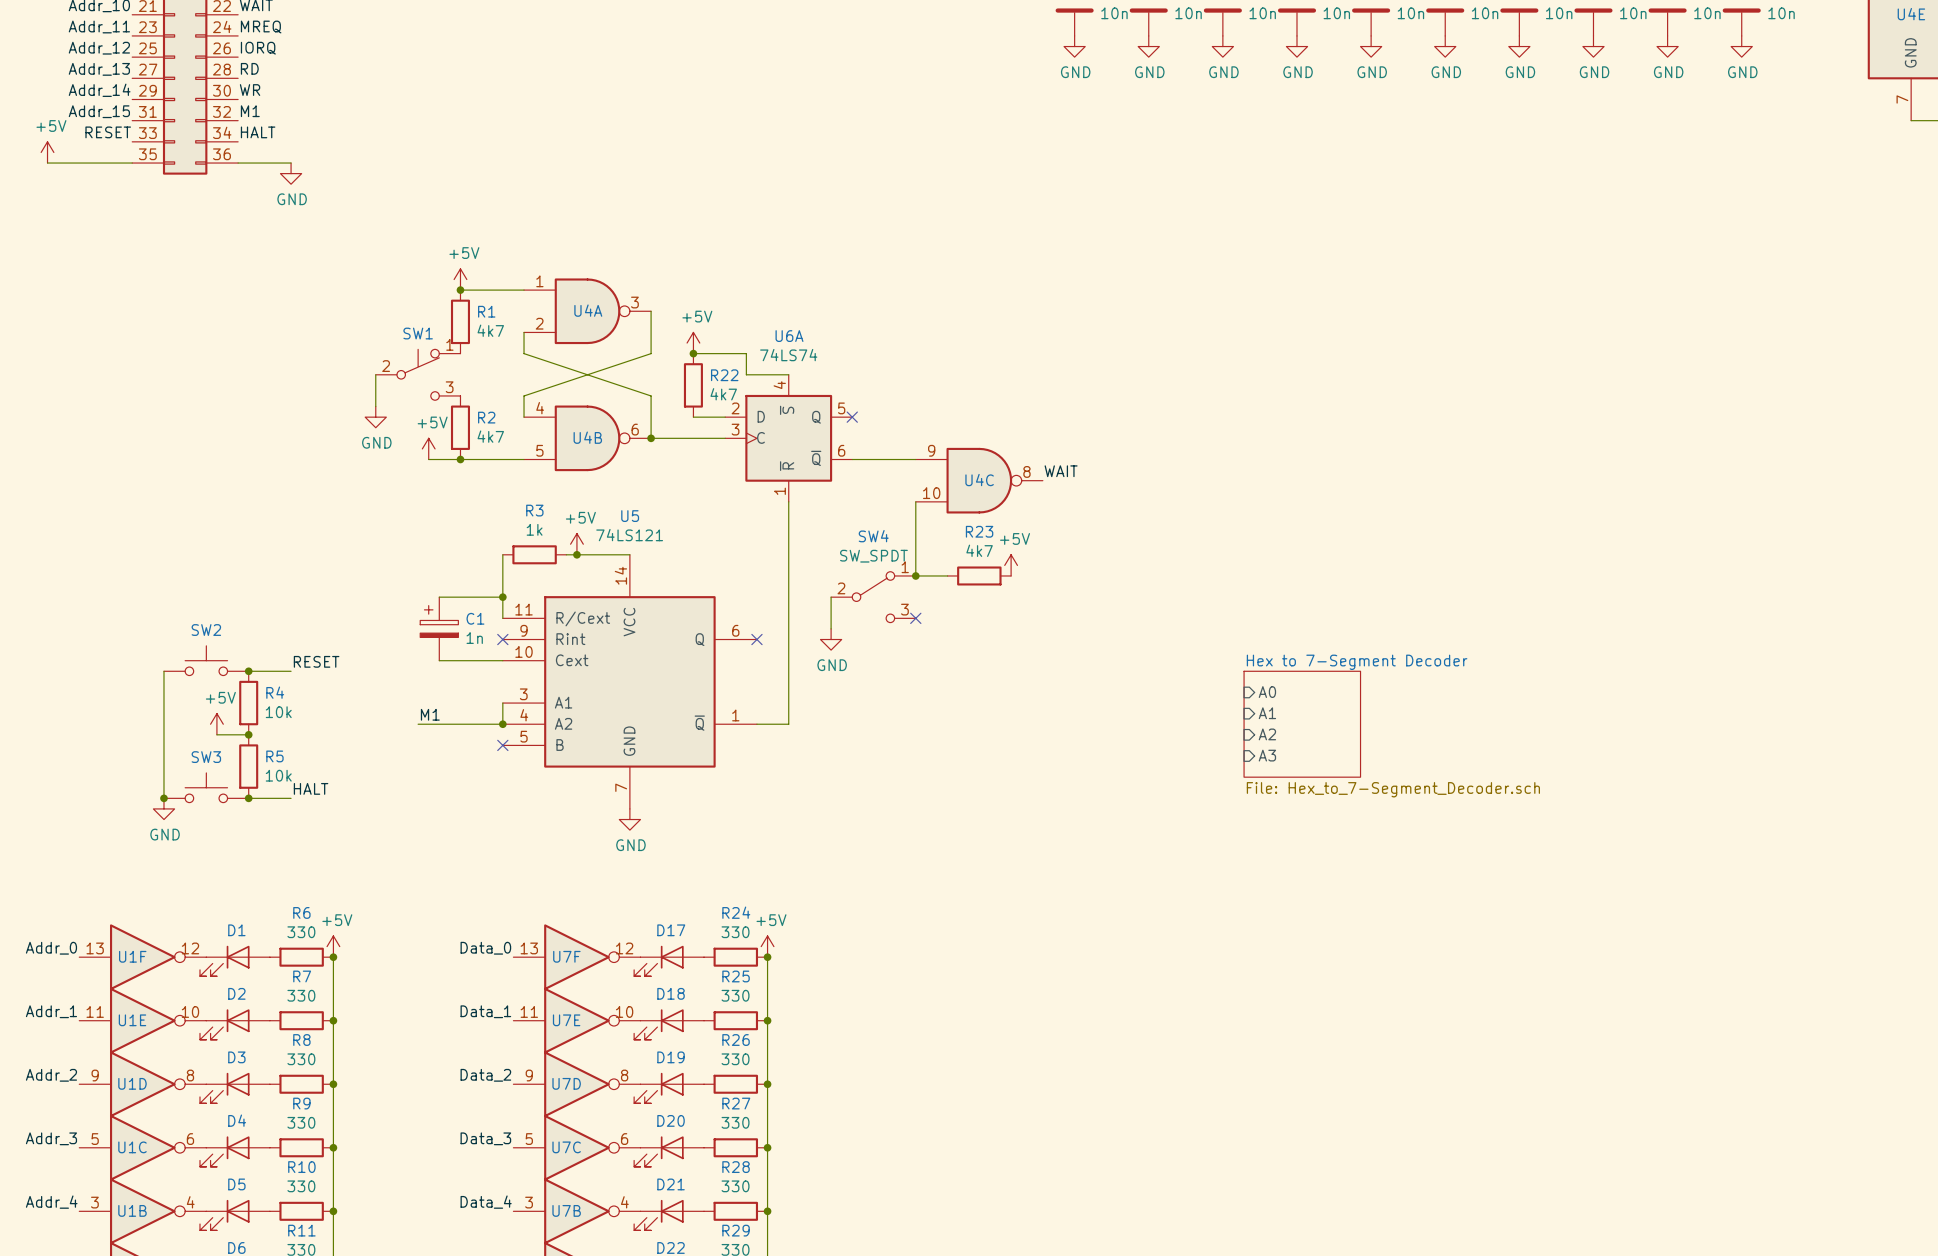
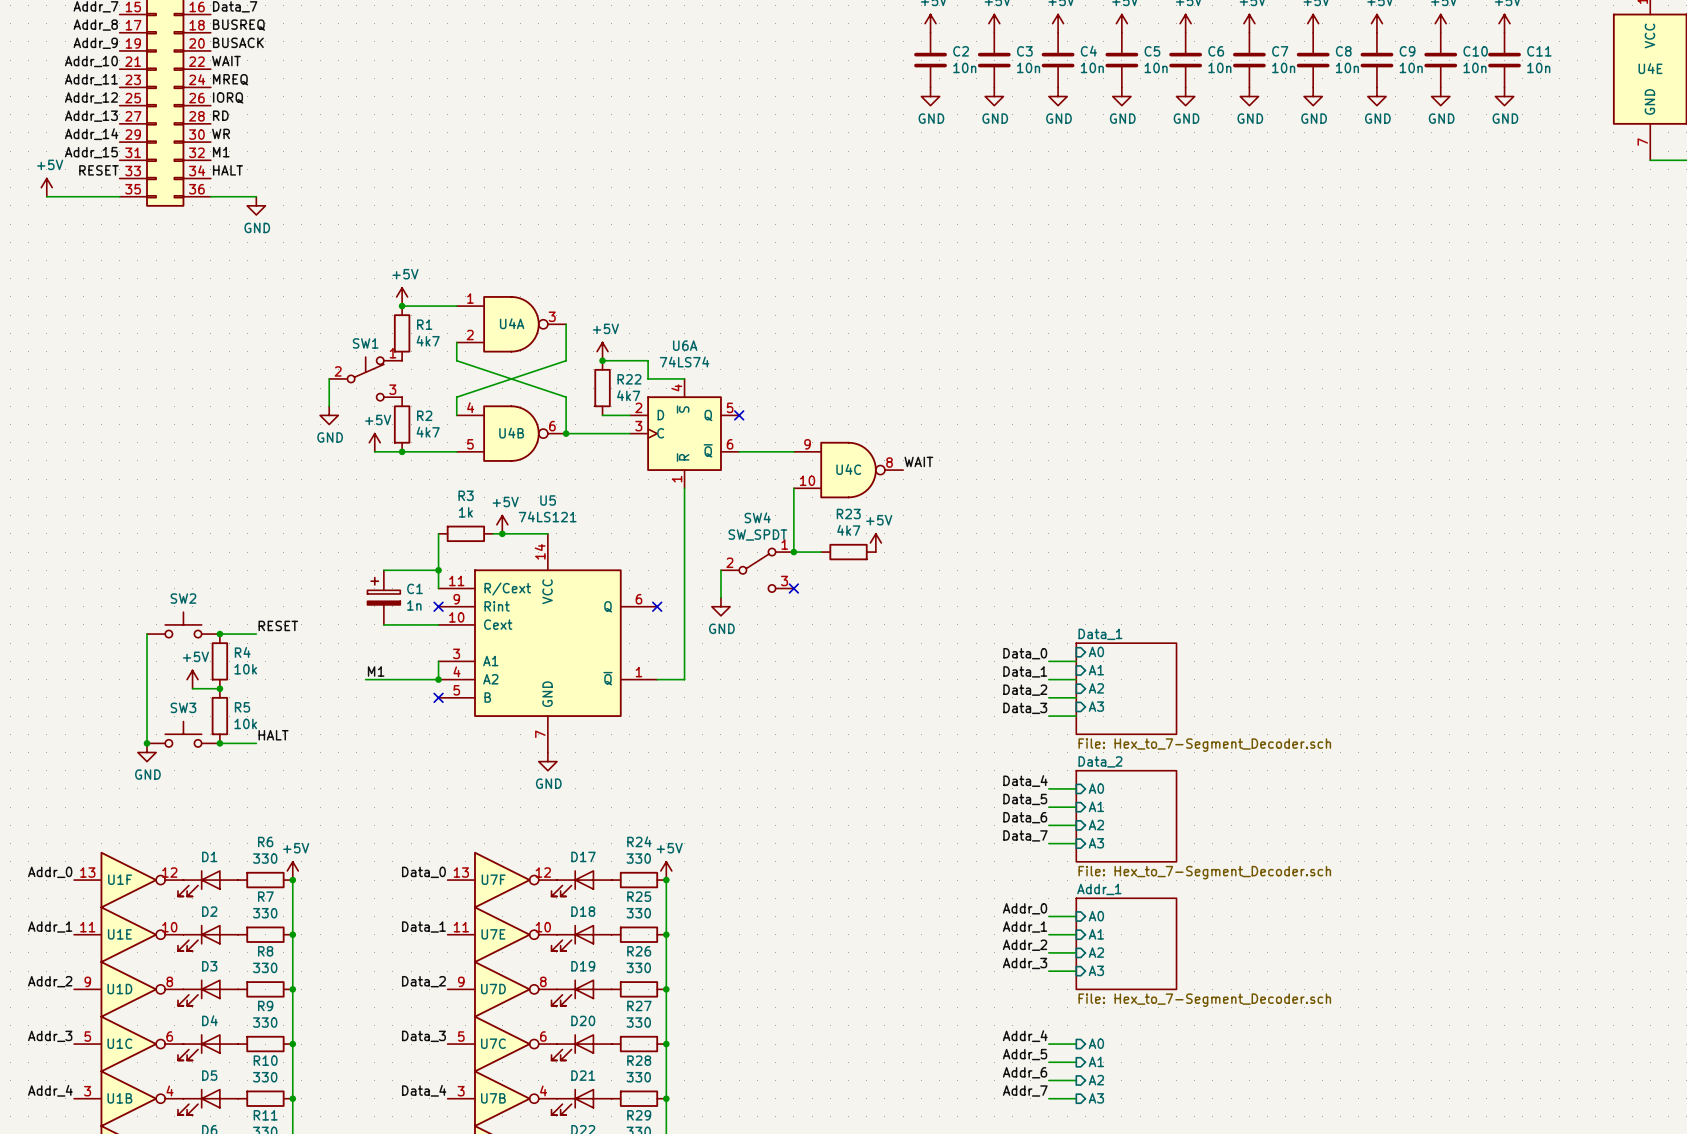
label: none -> Data_0 (1025, 653)
wire: none -> (1048, 661) (1076, 661)
label: none -> Data_1 (1025, 671)
wire: none -> (1048, 679) (1076, 679)
sheet Hex to 7-Segment Decoder: File: Hex_to_7-Segment_Decoder.sch (1302, 724) -> none
sheet Data_1: none -> File: Hex_to_7-Segment_Decoder.sch (1126, 688)
label: none -> Data_2 (1025, 690)
wire: none -> (1048, 697) (1076, 697)
label: none -> Data_3 (1025, 708)
wire: none -> (1048, 716) (1076, 716)
label: none -> Data_4 (1025, 781)
sheet pin: none -> A0 (1096, 788)
wire: none -> (1048, 788) (1076, 788)
label: none -> Data_5 (1025, 799)
wire: none -> (1048, 807) (1076, 807)
sheet pin: none -> A1 (1096, 806)
sheet Data_2: none -> File: Hex_to_7-Segment_Decoder.sch (1126, 816)
label: none -> Data_6 (1025, 817)
wire: none -> (1048, 825) (1076, 825)
sheet pin: none -> A2 (1096, 825)
label: none -> Data_7 (1025, 835)
wire: none -> (1048, 843) (1076, 843)
sheet pin: none -> A3 (1096, 843)
label: none -> Addr_0 (1025, 908)
wire: none -> (1048, 916) (1076, 916)
sheet pin: none -> A0 (1096, 916)
label: none -> Addr_1 (1025, 927)
wire: none -> (1048, 934) (1076, 934)
sheet pin: none -> A1 (1096, 934)
sheet Addr_1: none -> File: Hex_to_7-Segment_Decoder.sch (1126, 943)
label: none -> Addr_2 (1025, 945)
wire: none -> (1048, 952) (1076, 952)
sheet pin: none -> A2 (1096, 952)
label: none -> Addr_3 (1025, 963)
sheet pin: none -> A3 (1096, 970)
wire: none -> (1048, 971) (1076, 971)
label: none -> Addr_4 (1025, 1036)
wire: none -> (1048, 1044) (1076, 1044)
sheet pin: none -> A0 (1096, 1043)
label: none -> Addr_5 (1025, 1054)
wire: none -> (1048, 1062) (1076, 1062)
sheet pin: none -> A1 (1096, 1061)
label: none -> Addr_6 (1025, 1072)
sheet pin: none -> A2 (1096, 1080)
wire: none -> (1048, 1080) (1076, 1080)
label: none -> Addr_7 (1025, 1091)
sheet pin: none -> A3 (1096, 1098)
wire: none -> (1048, 1098) (1076, 1098)

